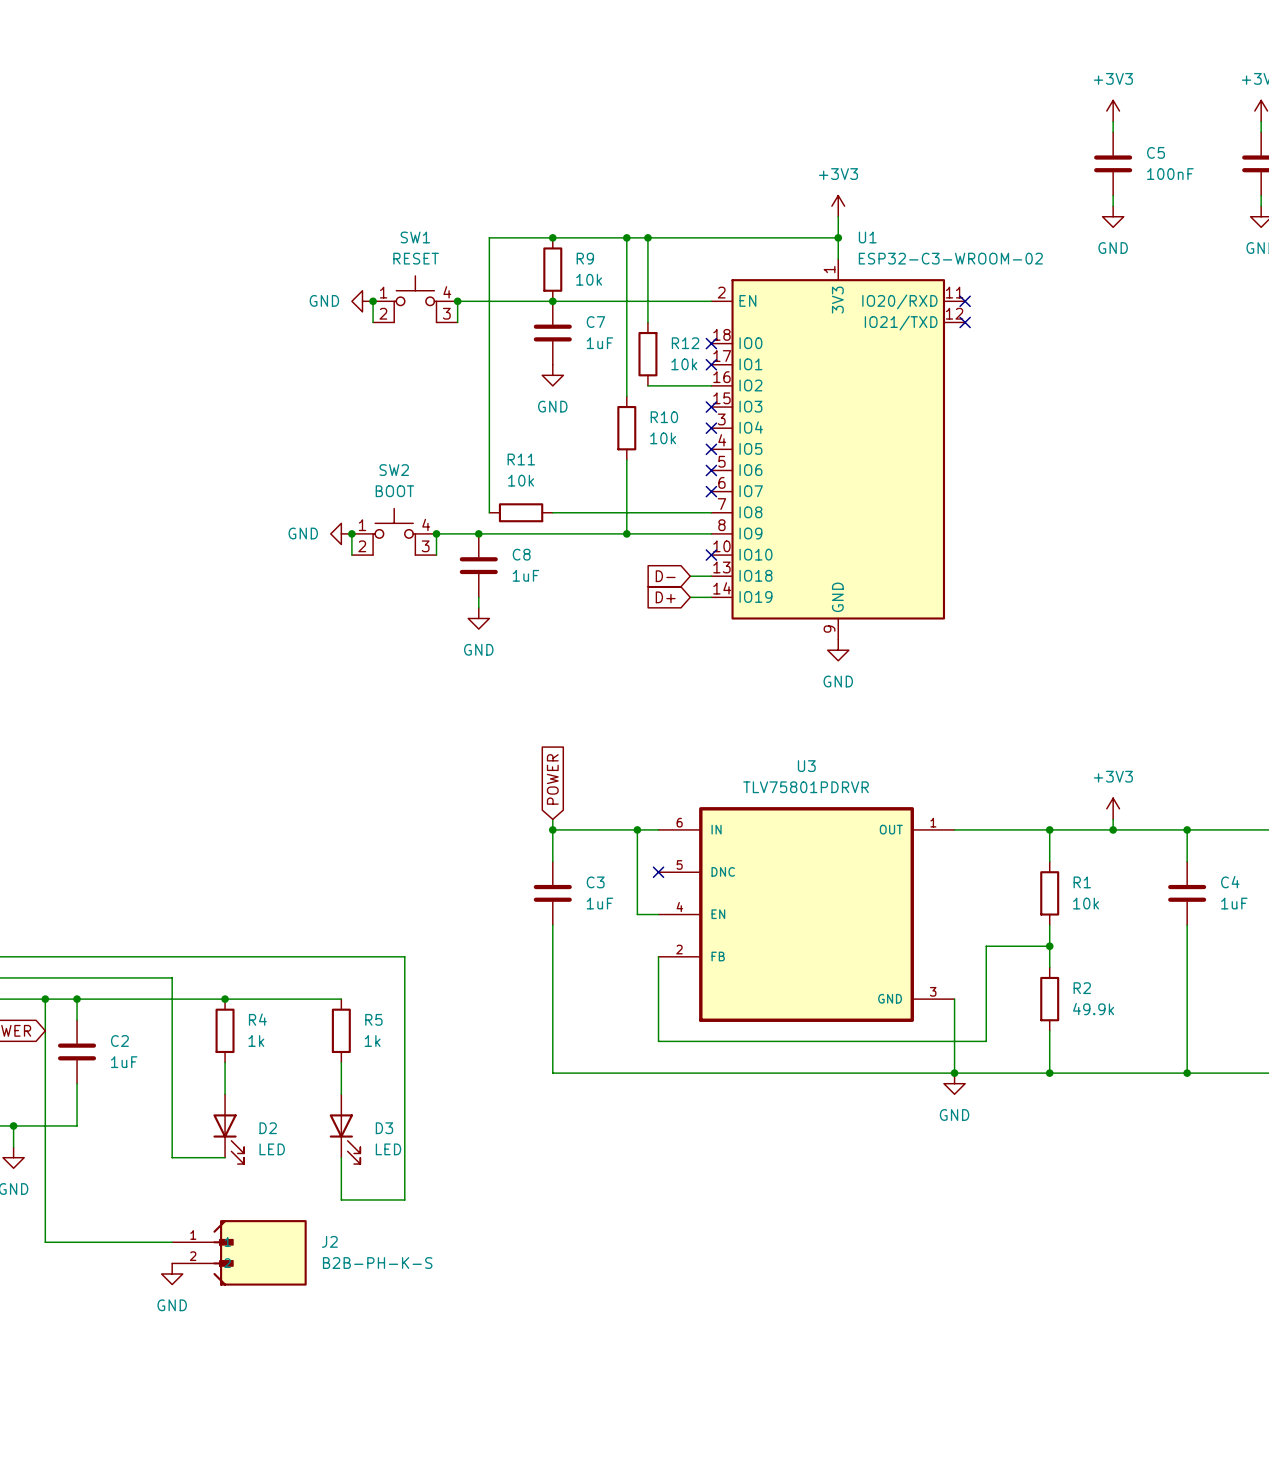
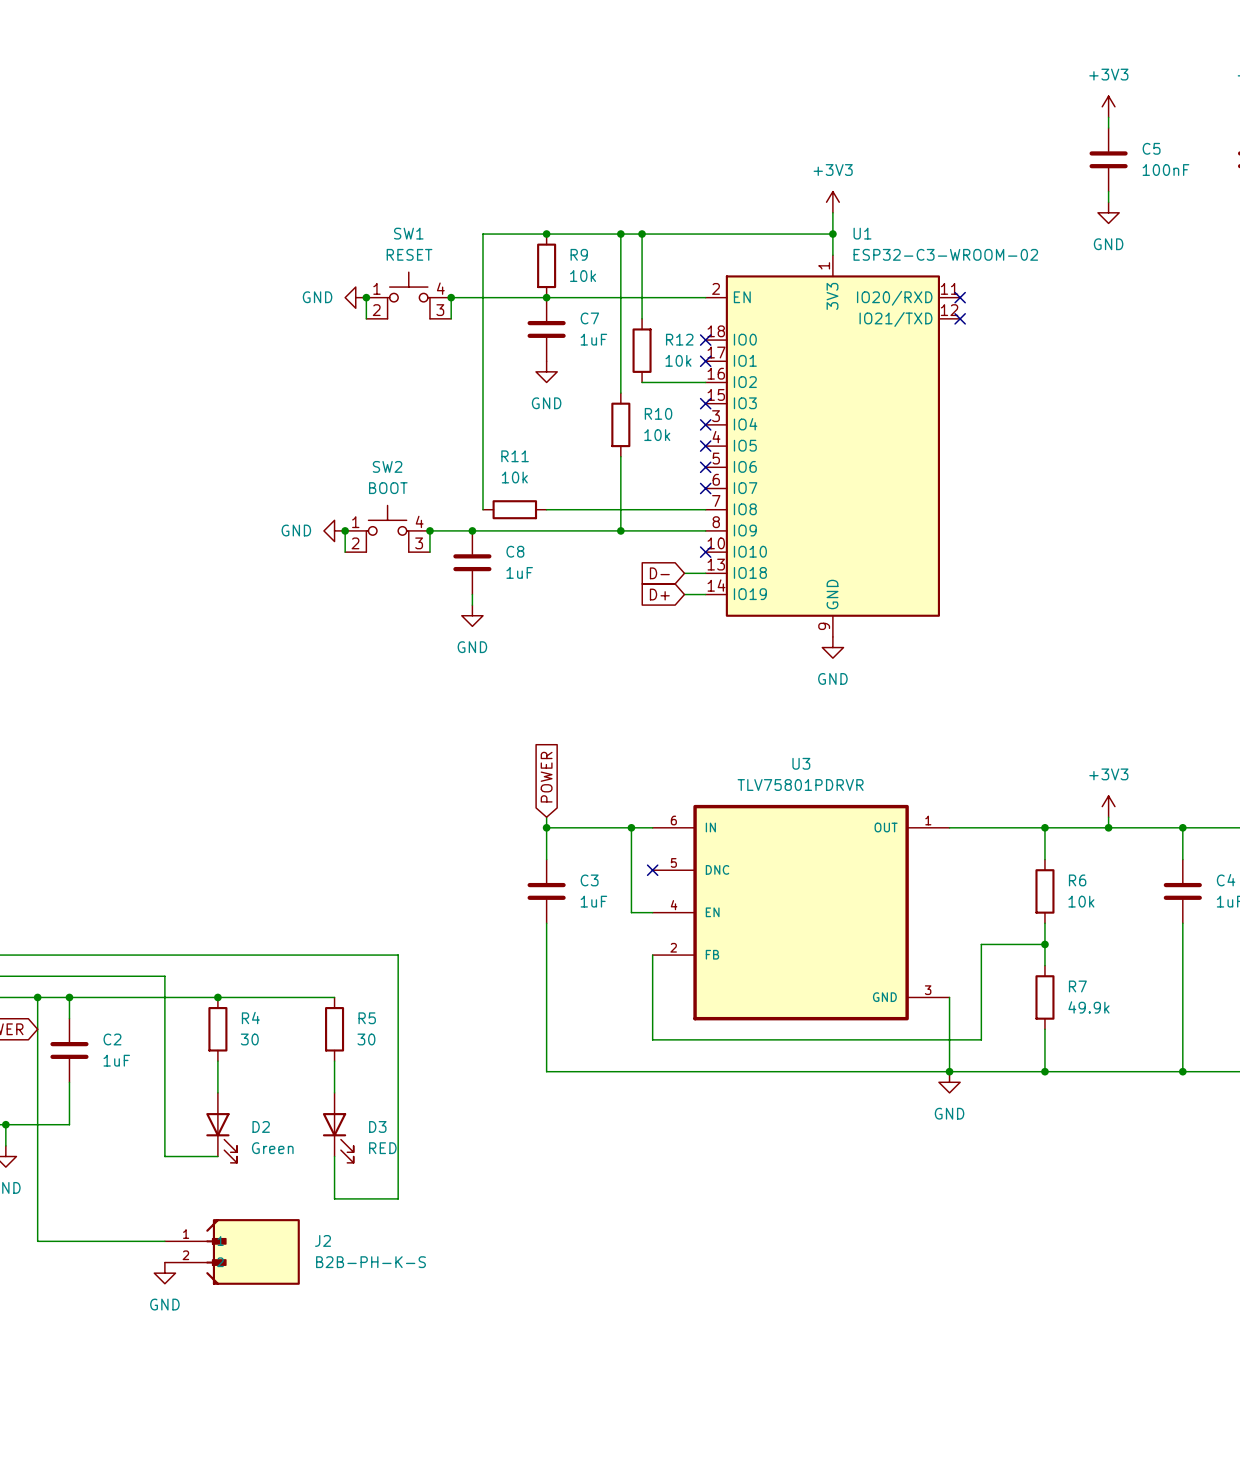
R1 name: R1 (1082, 882) -> R6 (1077, 880)
R2 name: R2 (1082, 988) -> R7 (1077, 986)
R4 value: 1k (256, 1041) -> 30 (249, 1039)
R5 value: 1k (372, 1041) -> 30 (366, 1039)
D2 value: LED (272, 1149) -> Green (272, 1148)
D3 value: LED (388, 1149) -> RED (382, 1148)

